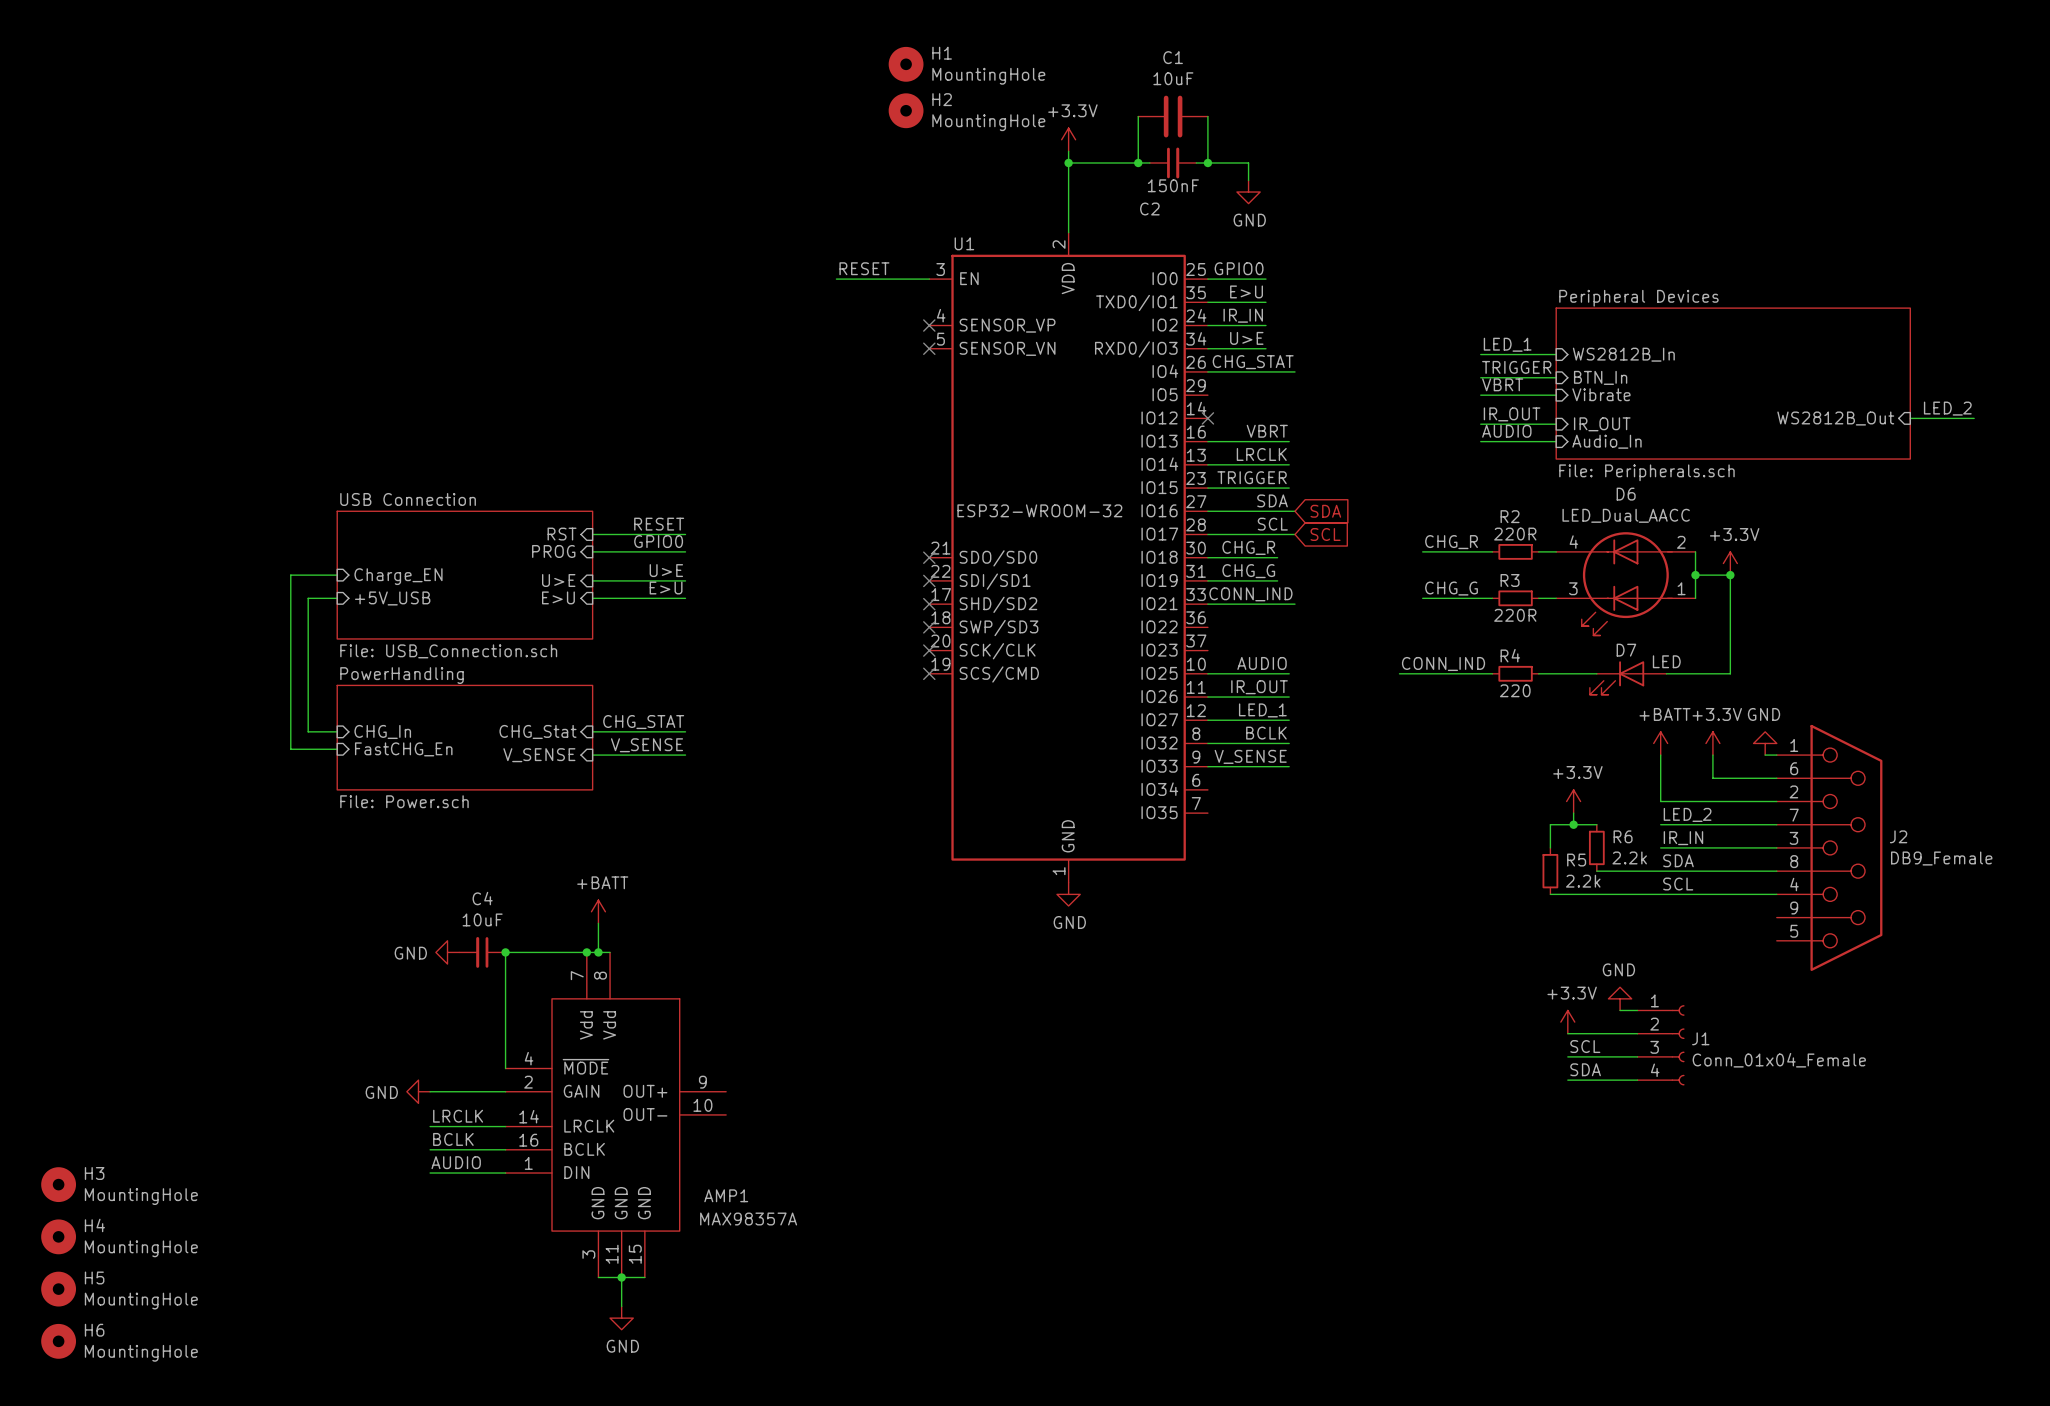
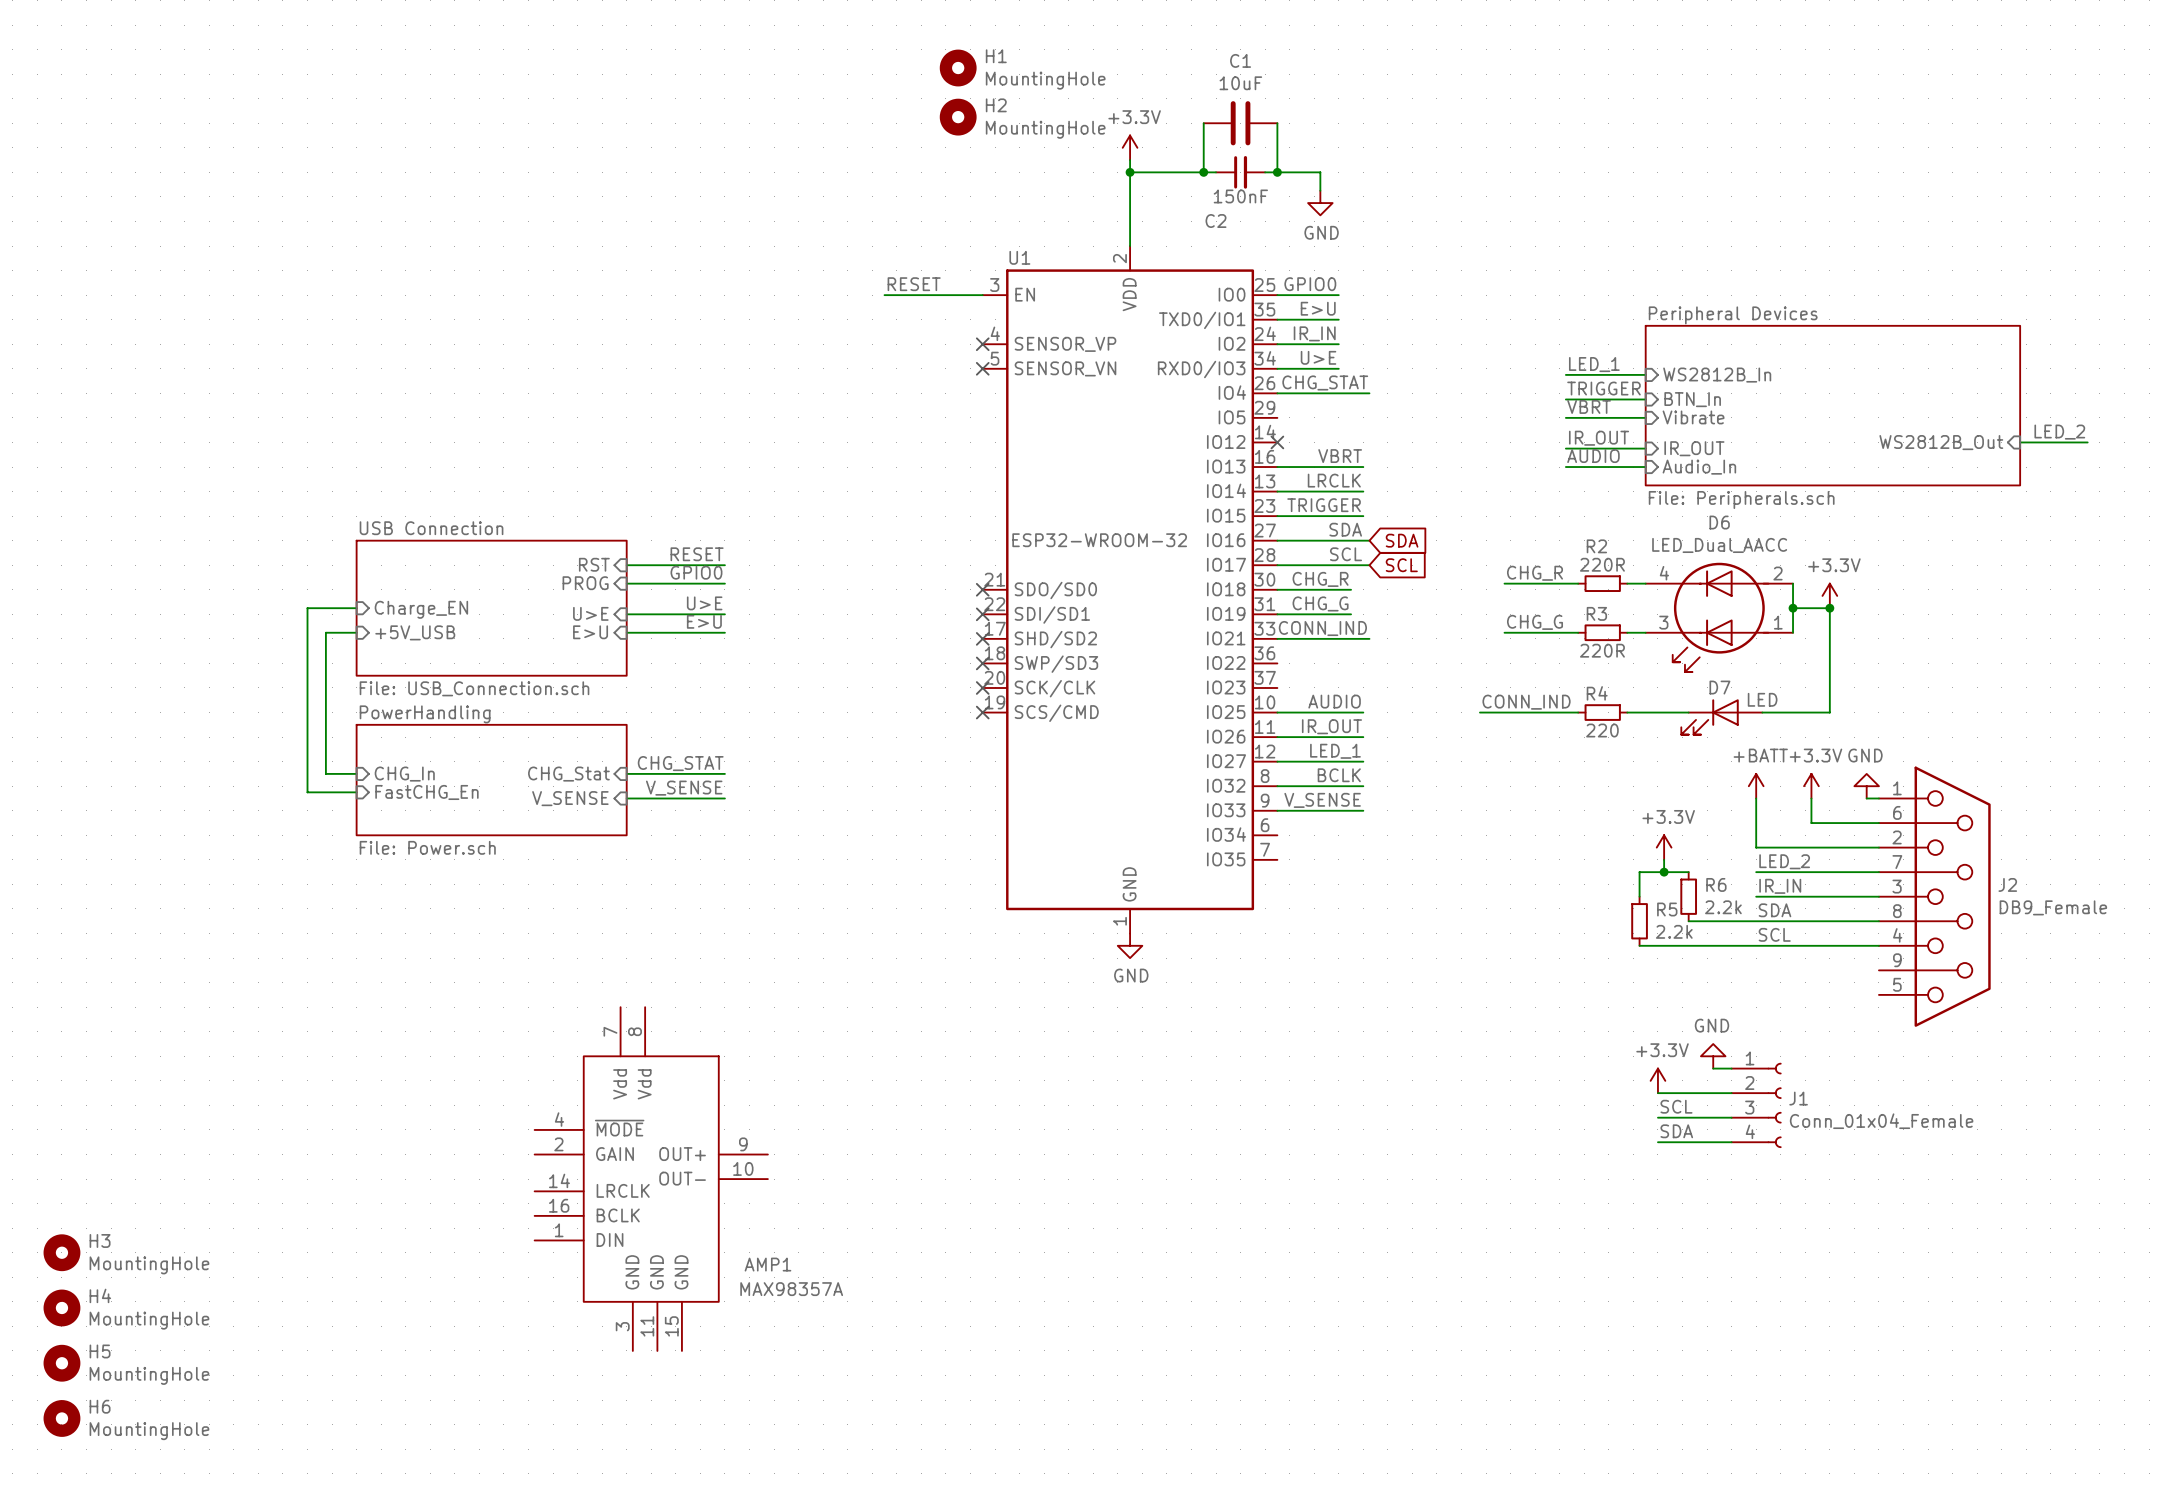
power symbol: +BATT (598, 911) -> none
wire: (598, 923) (598, 952) -> none
power symbol: GND (447, 952) -> none
C4: 10uF (482, 952) -> none
junction: (505, 952) -> none
junction: (586, 952) -> none
junction: (598, 952) -> none
wire: (610, 952) (505, 952) (505, 1068) -> none
power symbol: GND (418, 1091) -> none
wire: (430, 1091) (505, 1091) -> none
label: LRCLK (458, 1116) -> none
wire: (430, 1126) (505, 1126) -> none
label: BCLK (453, 1139) -> none
wire: (430, 1149) (505, 1149) -> none
label: AUDIO (456, 1162) -> none
wire: (430, 1173) (505, 1173) -> none
wire: (598, 1277) (644, 1277) -> none
wire: (621, 1277) (621, 1306) -> none
junction: (621, 1277) -> none
power symbol: GND (621, 1318) -> none

